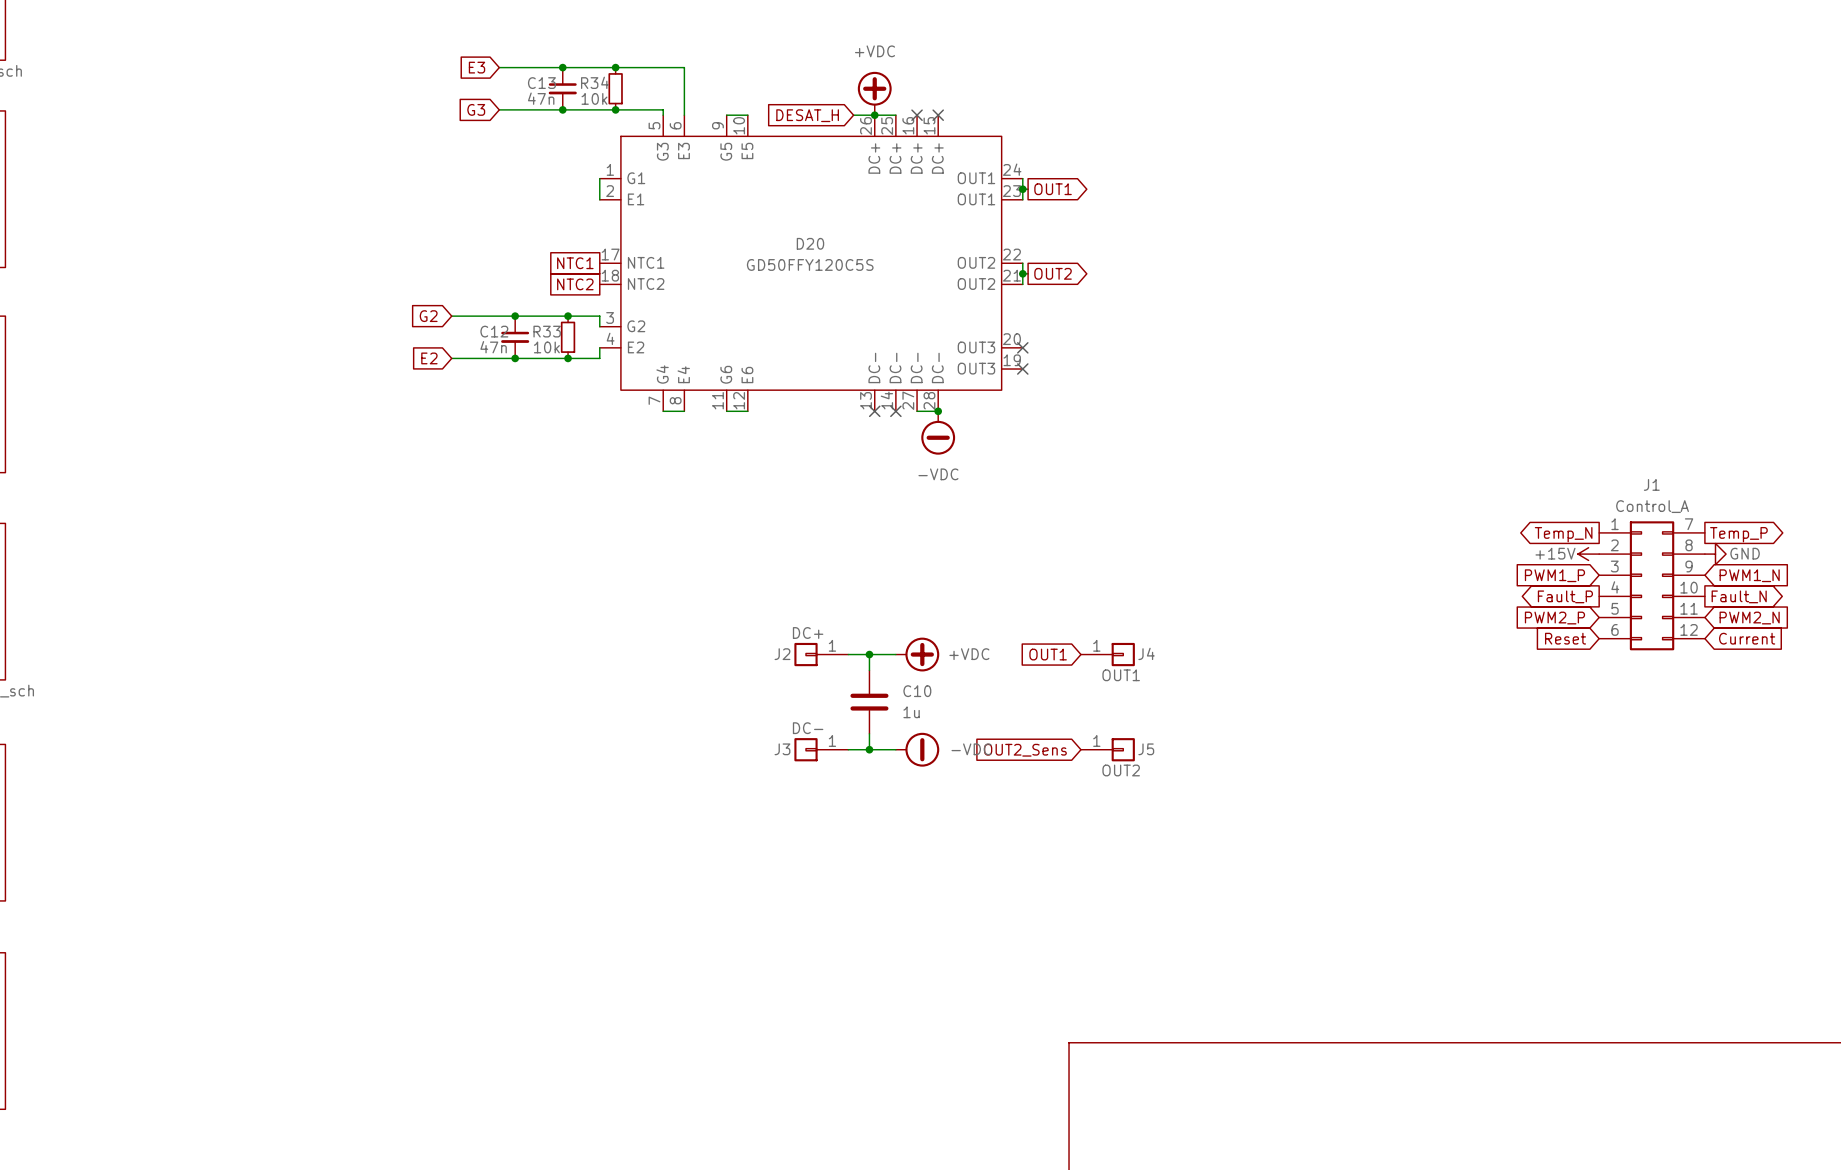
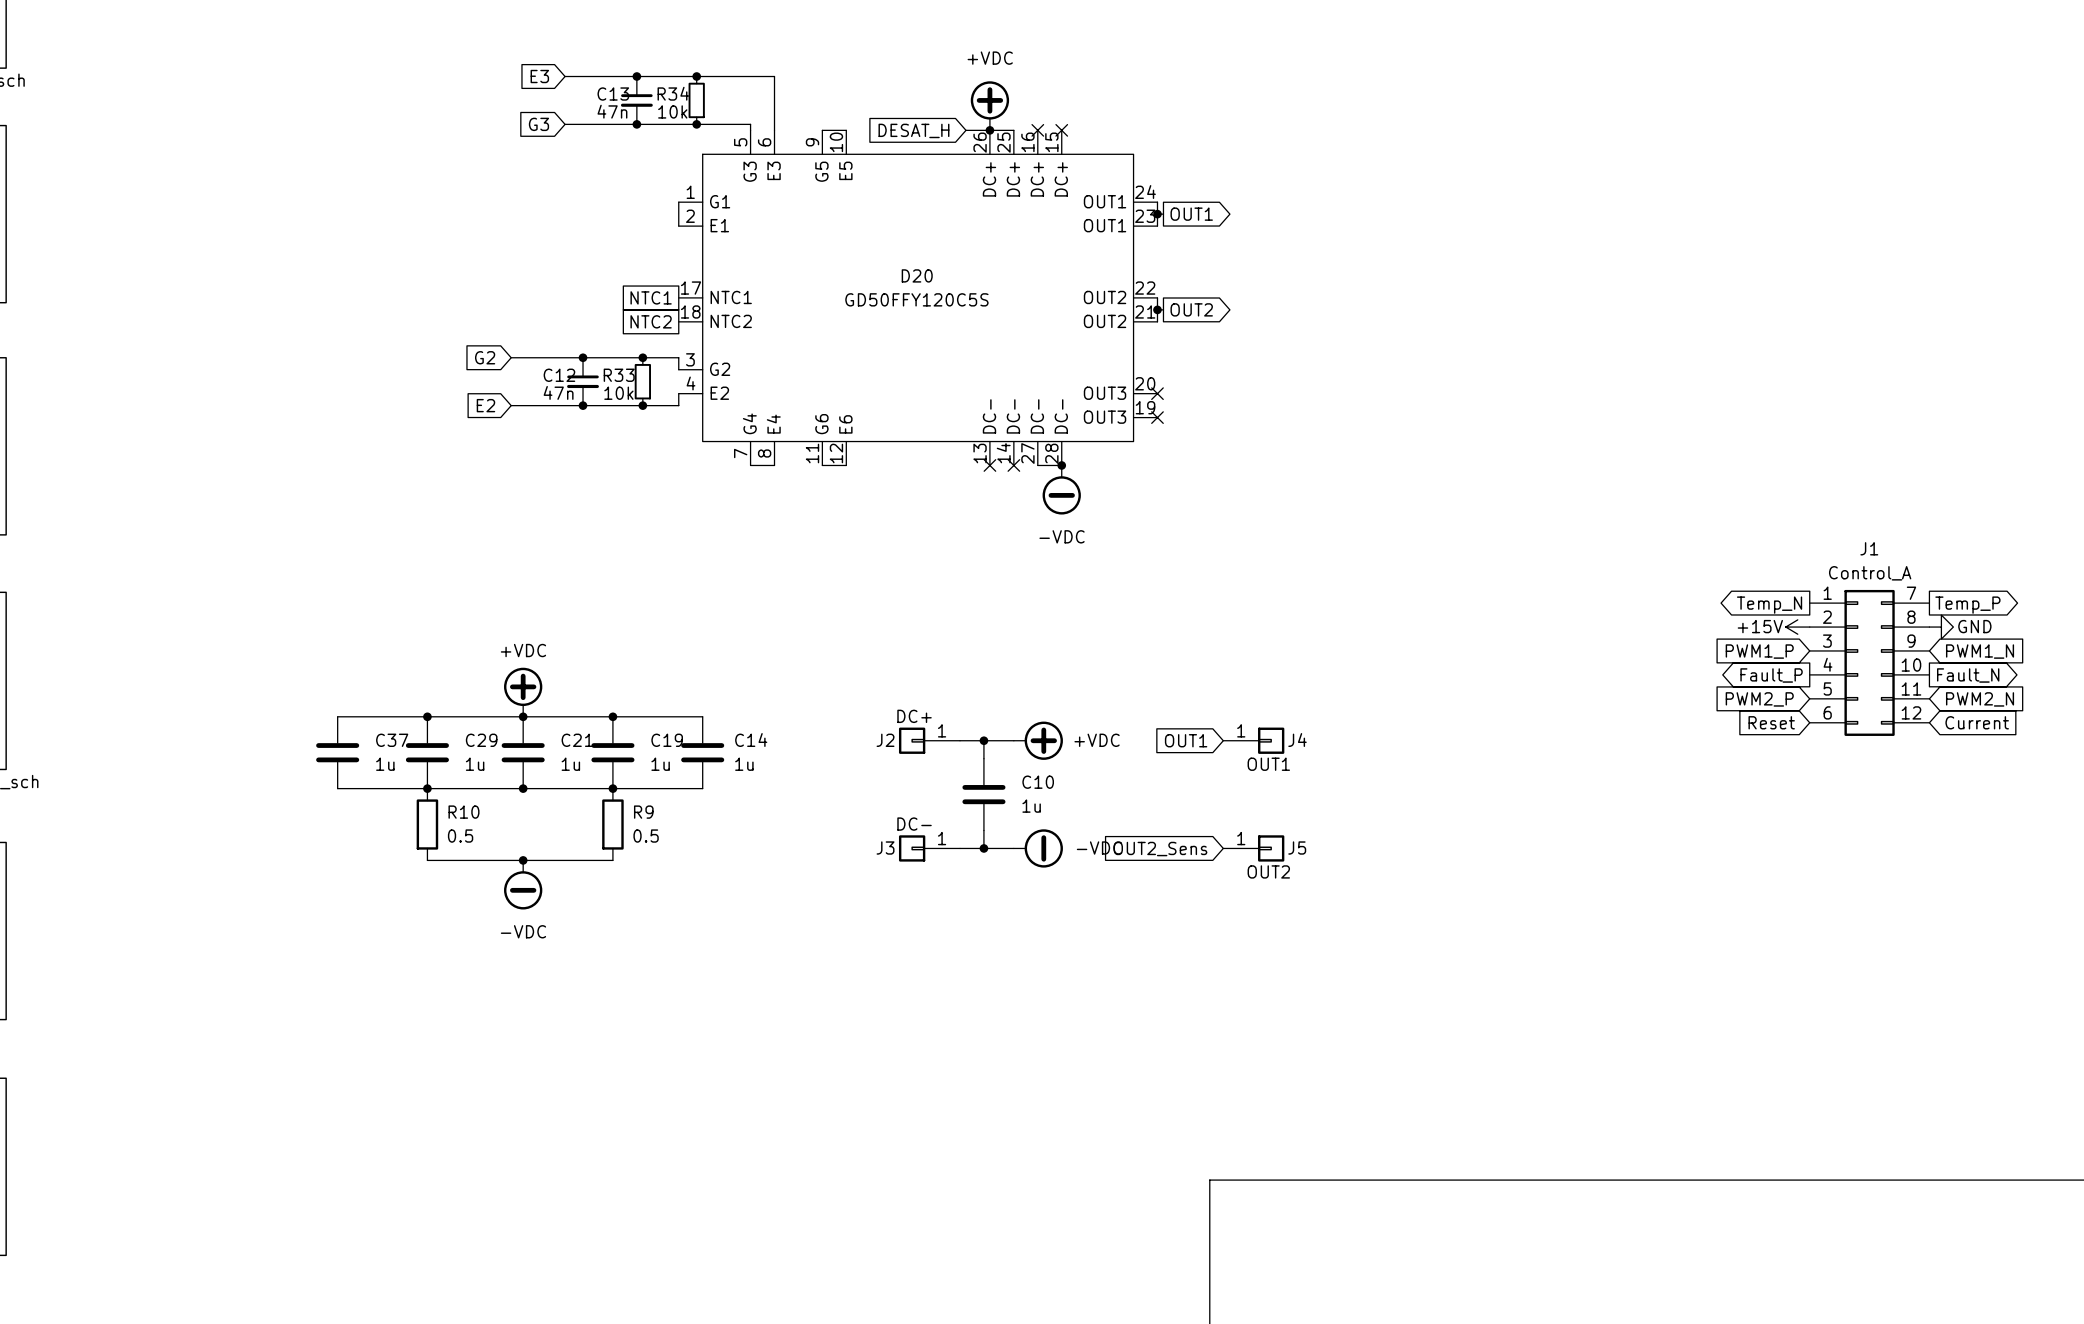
power symbol: none -> +VDC (523, 692)
wire: none -> (337, 716) (702, 716)
junction: none -> (427, 716)
junction: none -> (523, 716)
junction: none -> (612, 716)
C37: none -> 1u (337, 752)
C29: none -> 1u (427, 752)
C21: none -> 1u (523, 752)
C19: none -> 1u (612, 752)
C14: none -> 1u (702, 752)
wire: none -> (337, 788) (702, 788)
junction: none -> (427, 788)
junction: none -> (523, 788)
junction: none -> (612, 788)
R10: none -> 0.5 (427, 824)
R9: none -> 0.5 (612, 824)
wire: none -> (427, 860) (612, 860)
junction: none -> (523, 860)
power symbol: none -> -VDC (523, 884)

